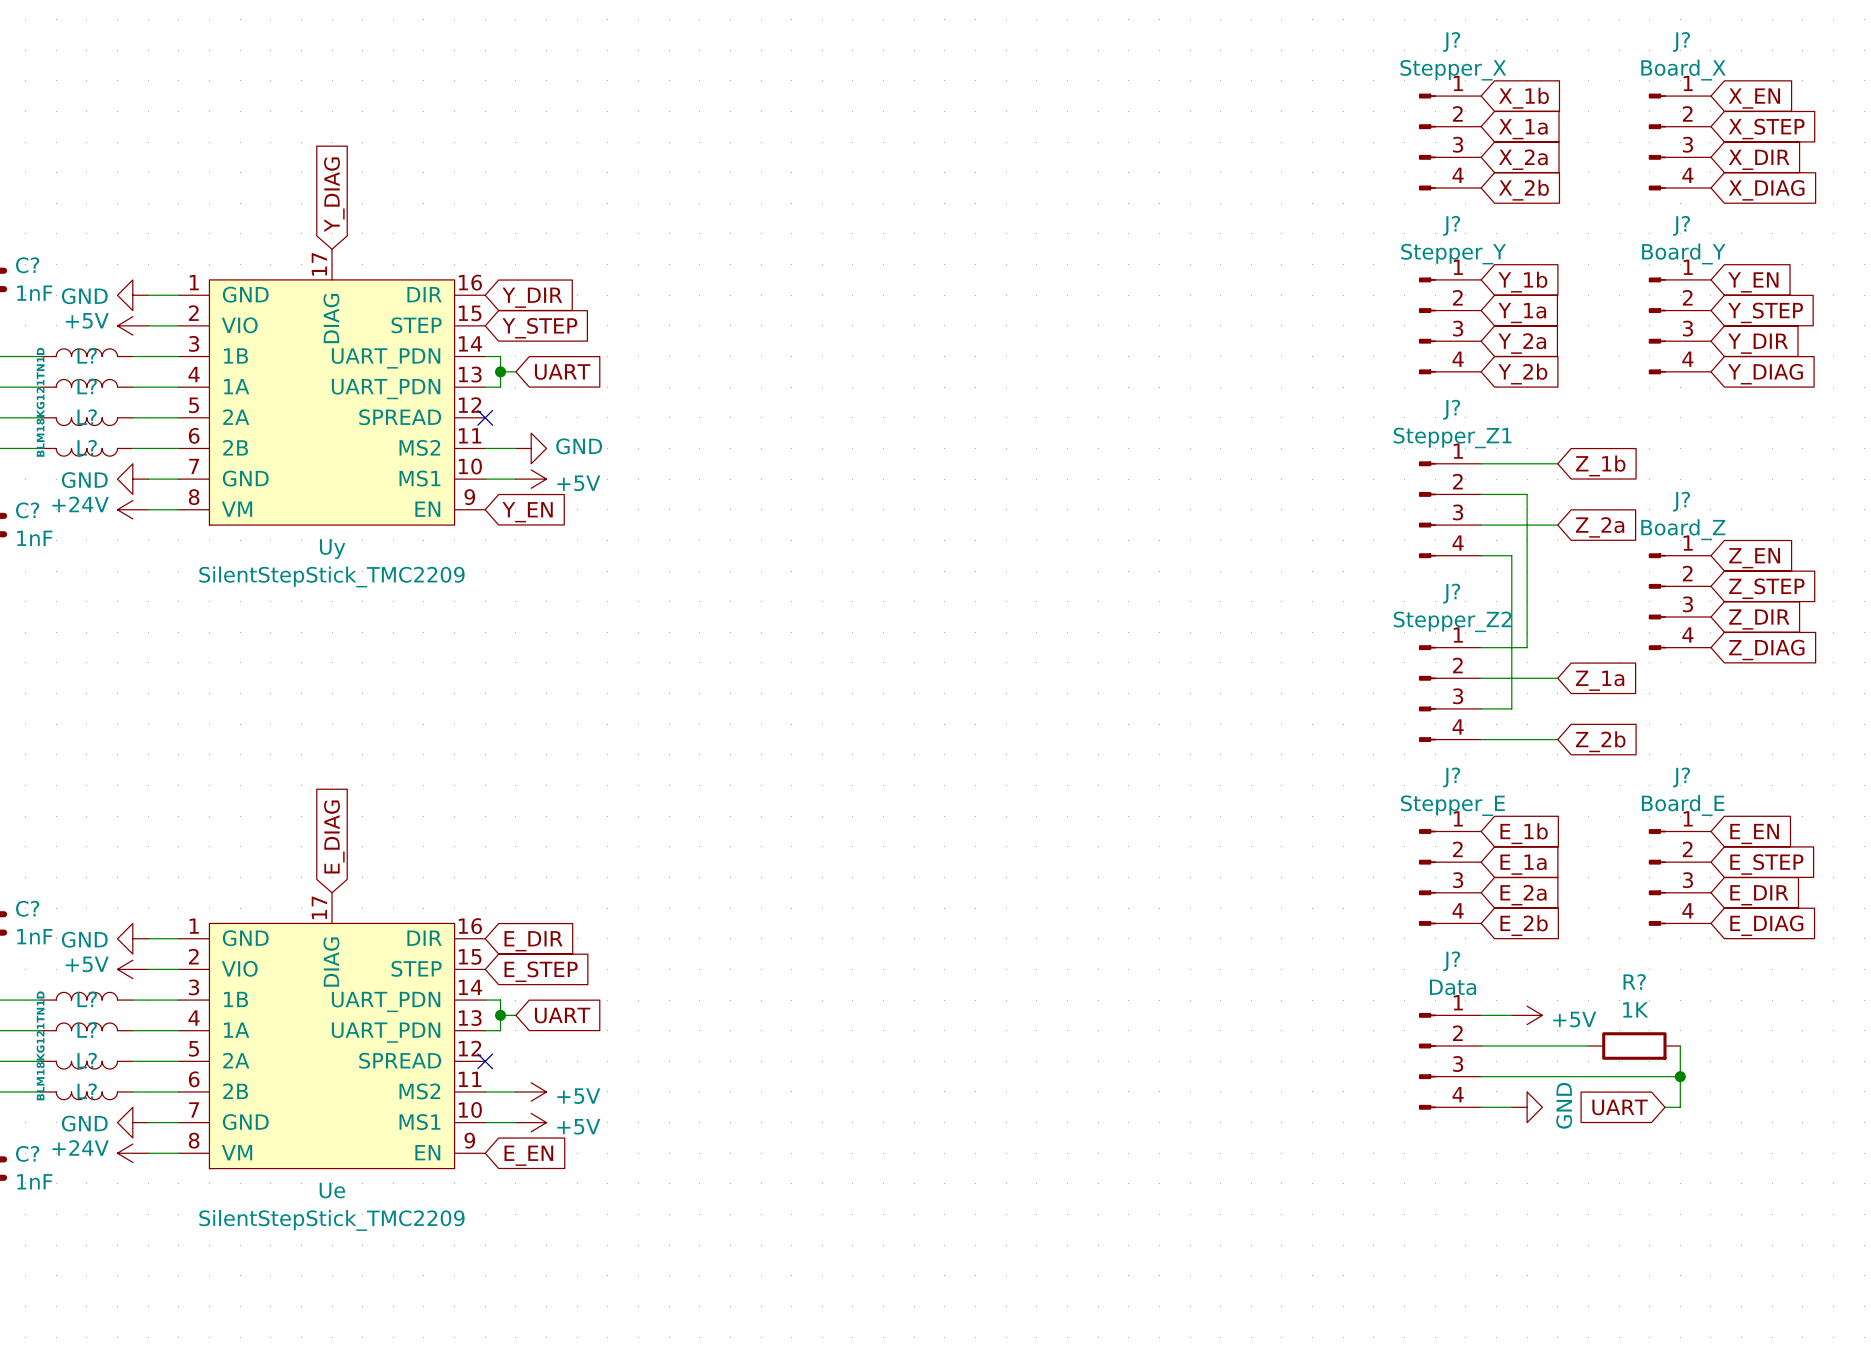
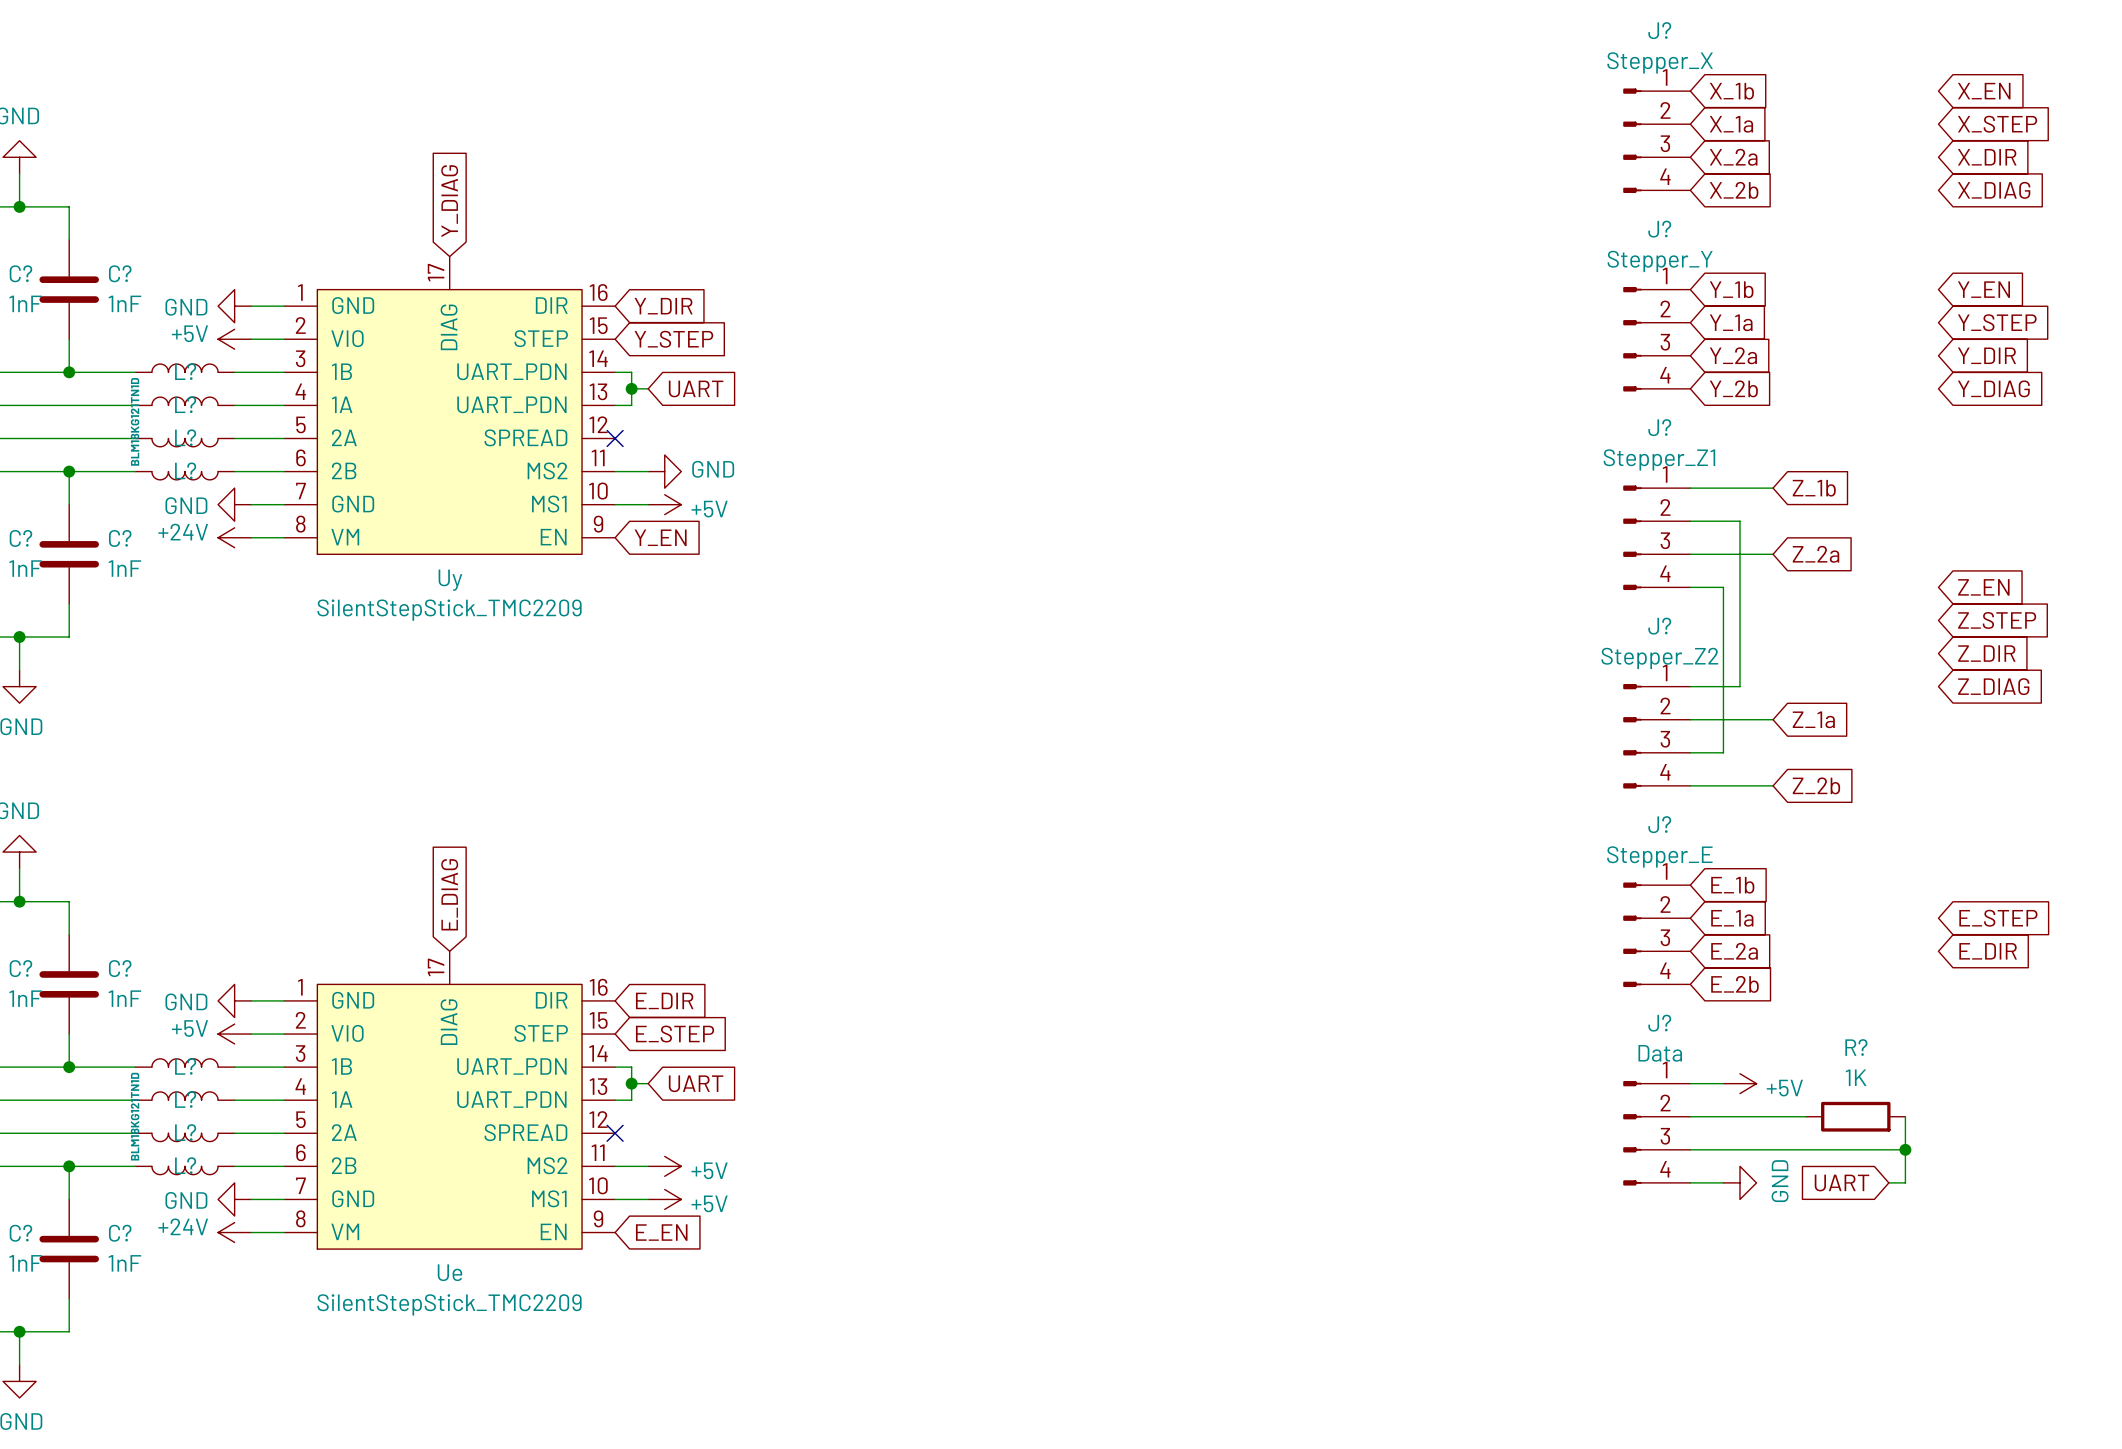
J?: Board_X (1679, 142) -> none
J?: Board_Y (1679, 325) -> none
J?: Board_Z (1679, 601) -> none
global label: E_EN (1754, 833) -> none
J?: Board_E (1679, 877) -> none
global label: E_DIAG (1766, 925) -> none

